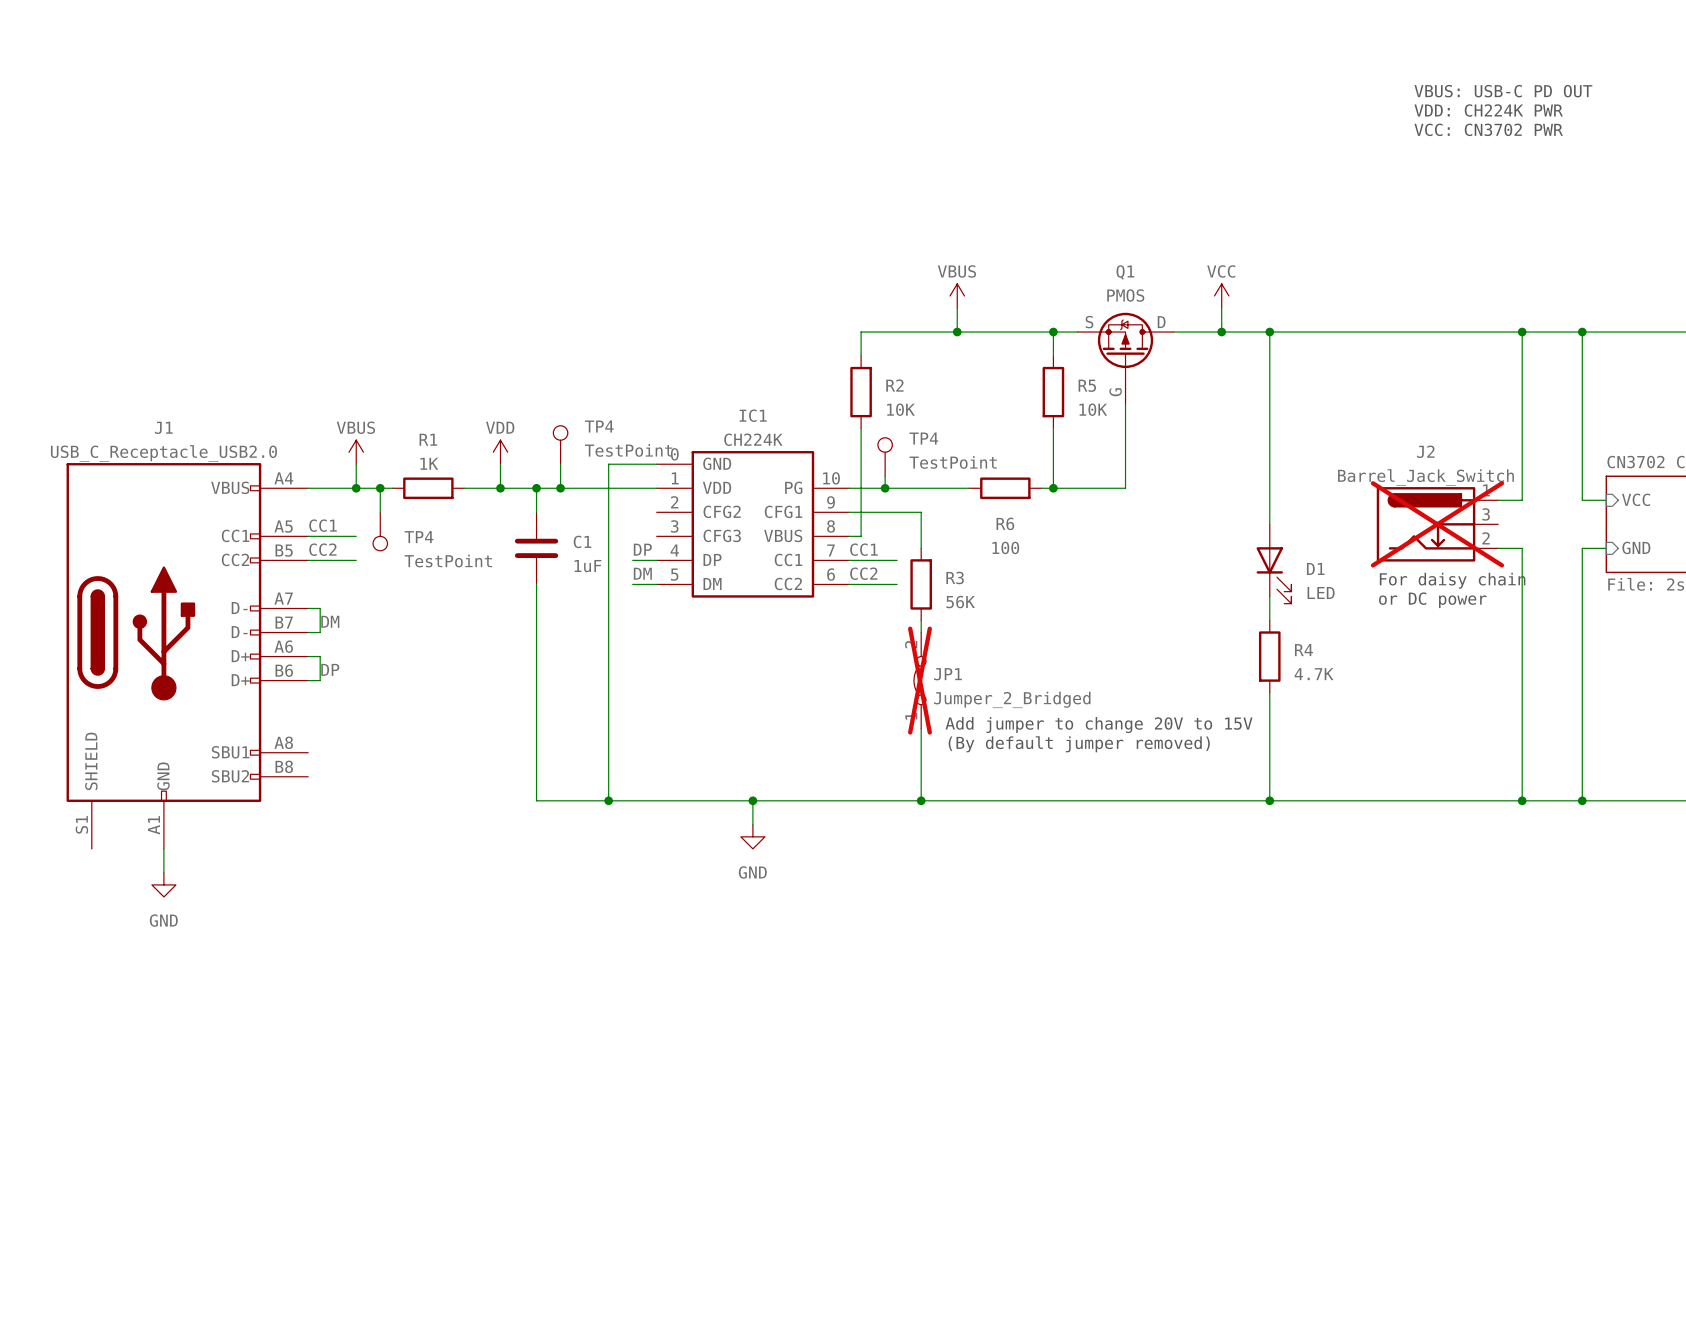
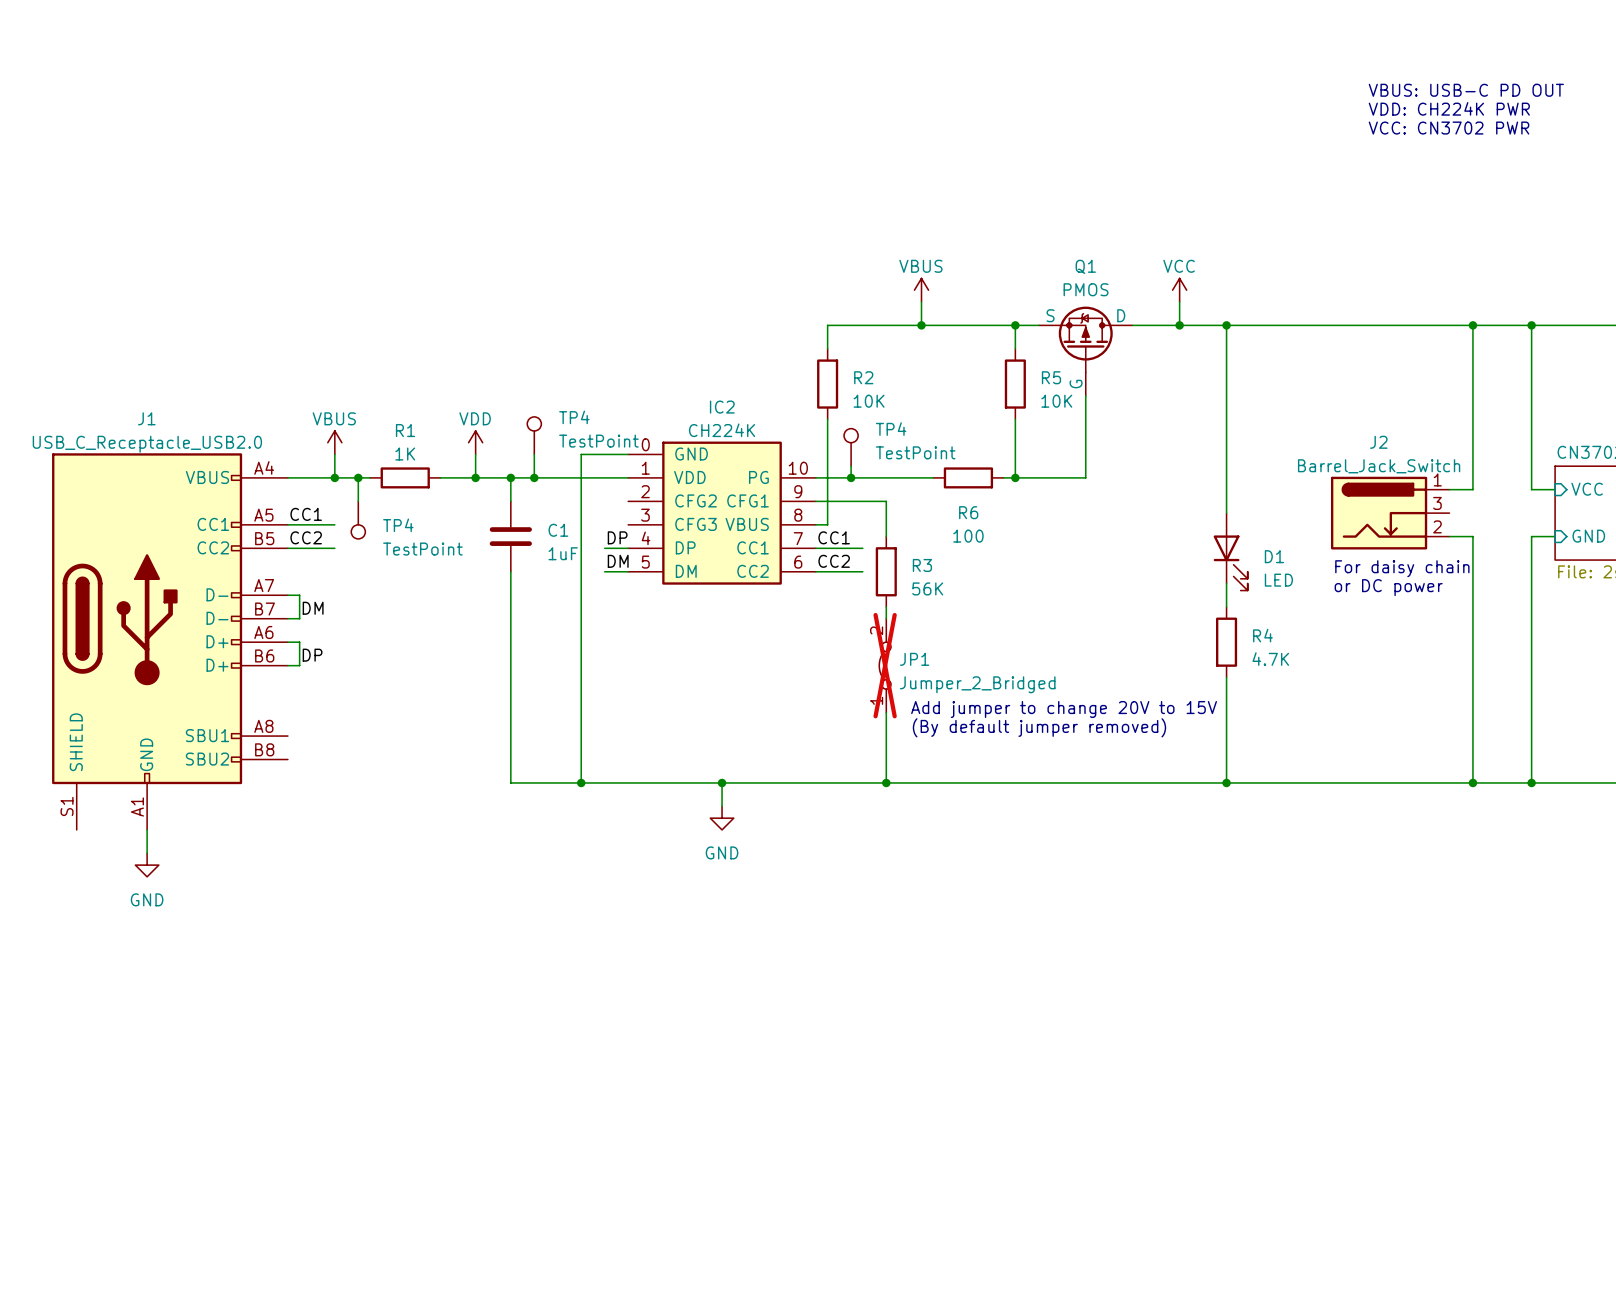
IC1 name: IC1 (753, 415) -> IC2 (722, 407)
J2 do-not-place cross: (1437, 524) -> none

